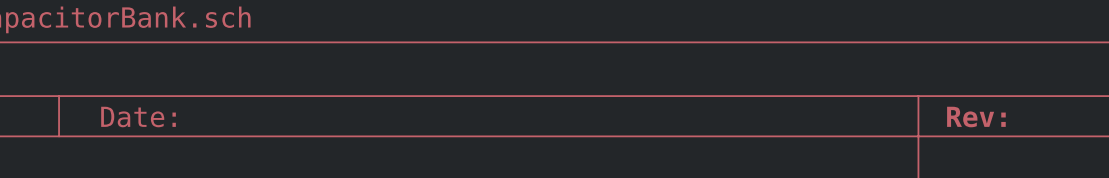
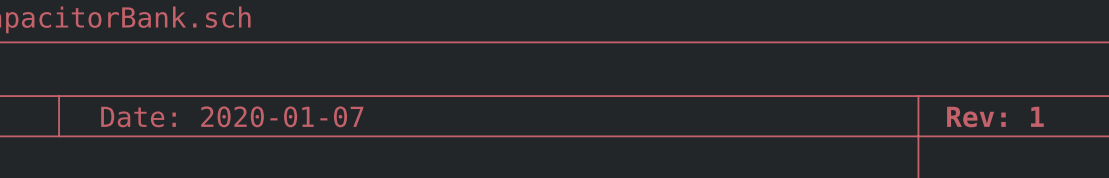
title block: Date: (138, 117) -> Date: 2020-01-07 (232, 116)
title block: Rev: (976, 117) -> Rev: 1 (995, 117)

